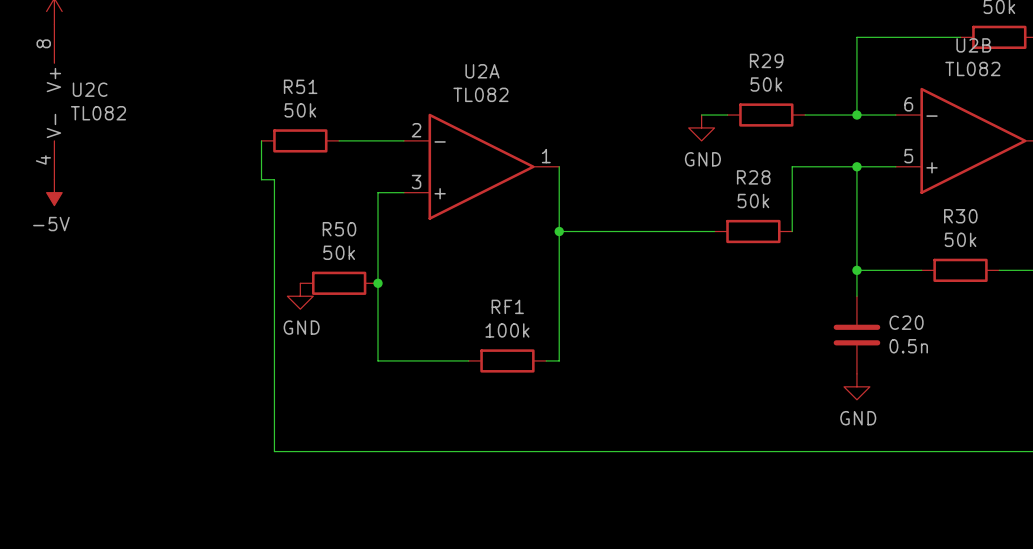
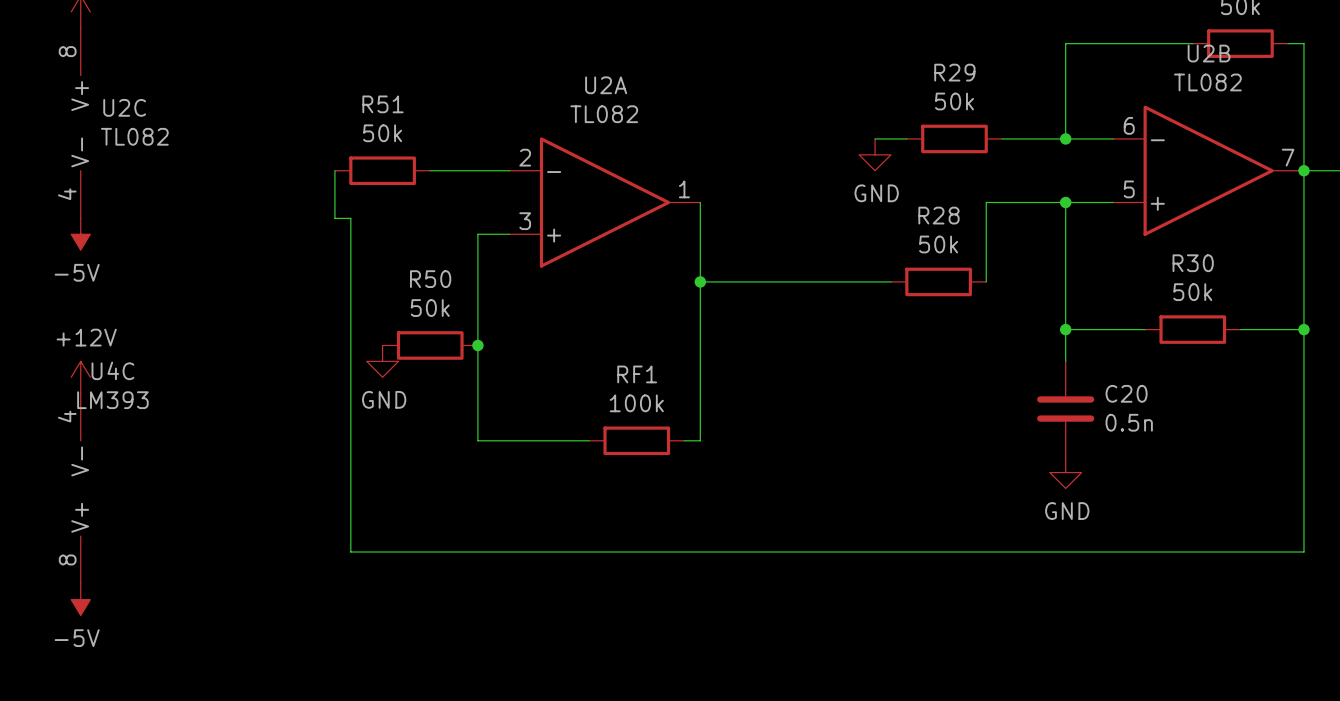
power symbol: none -> +12V (80, 377)
U4C: none -> LM393 (80, 488)
power symbol: none -> -5V (80, 599)

